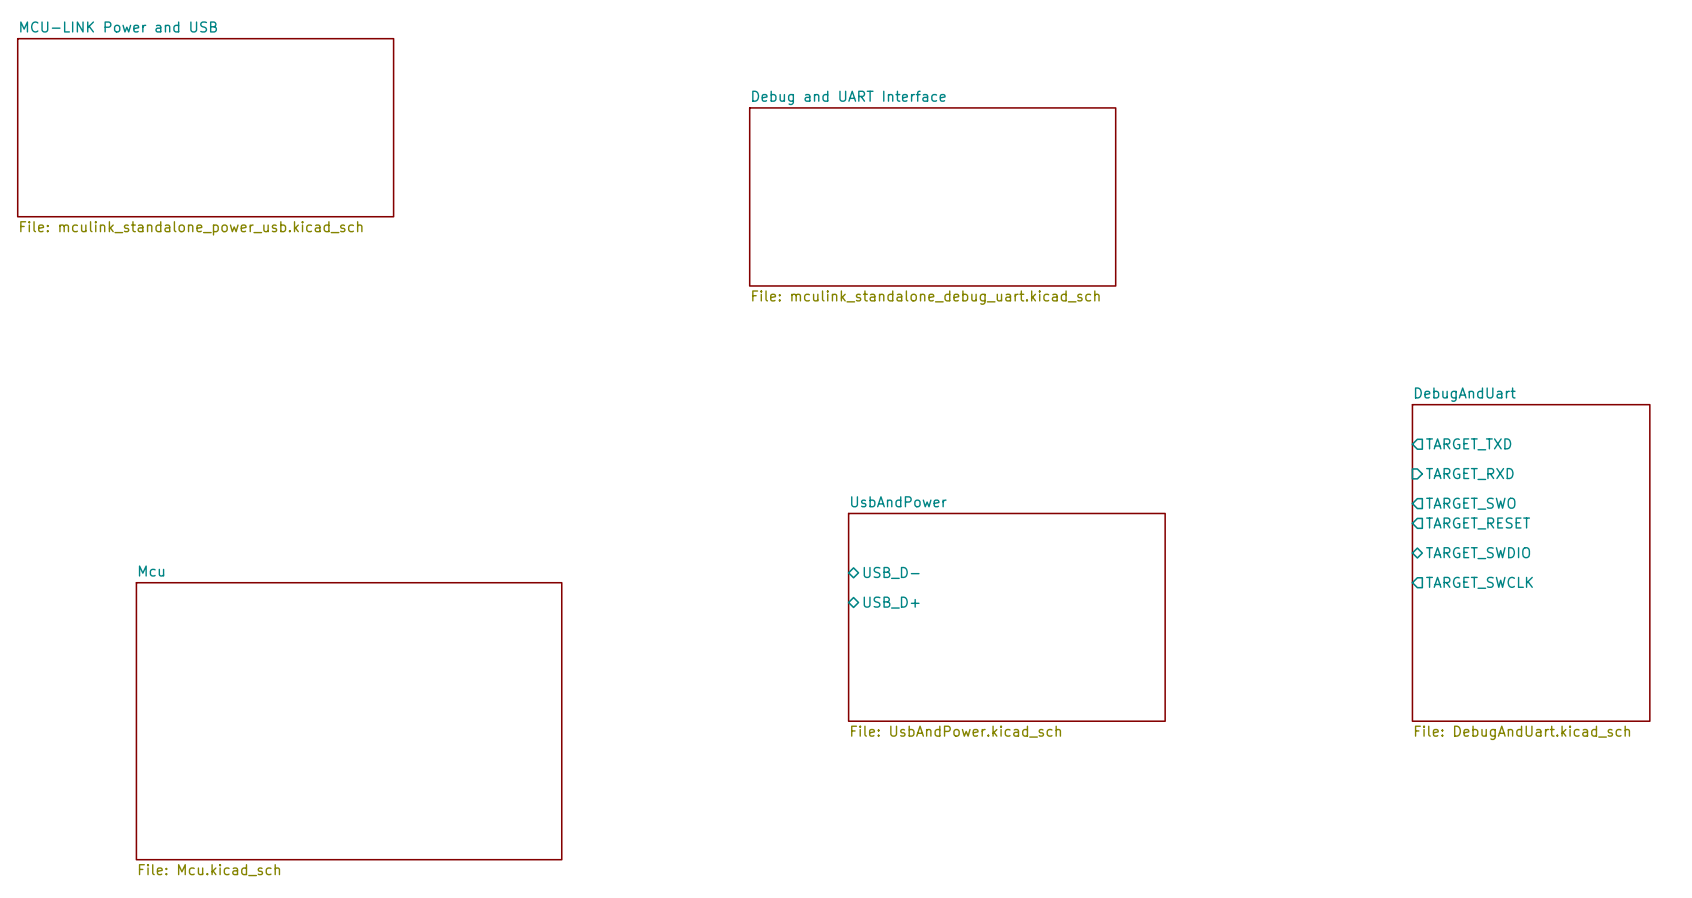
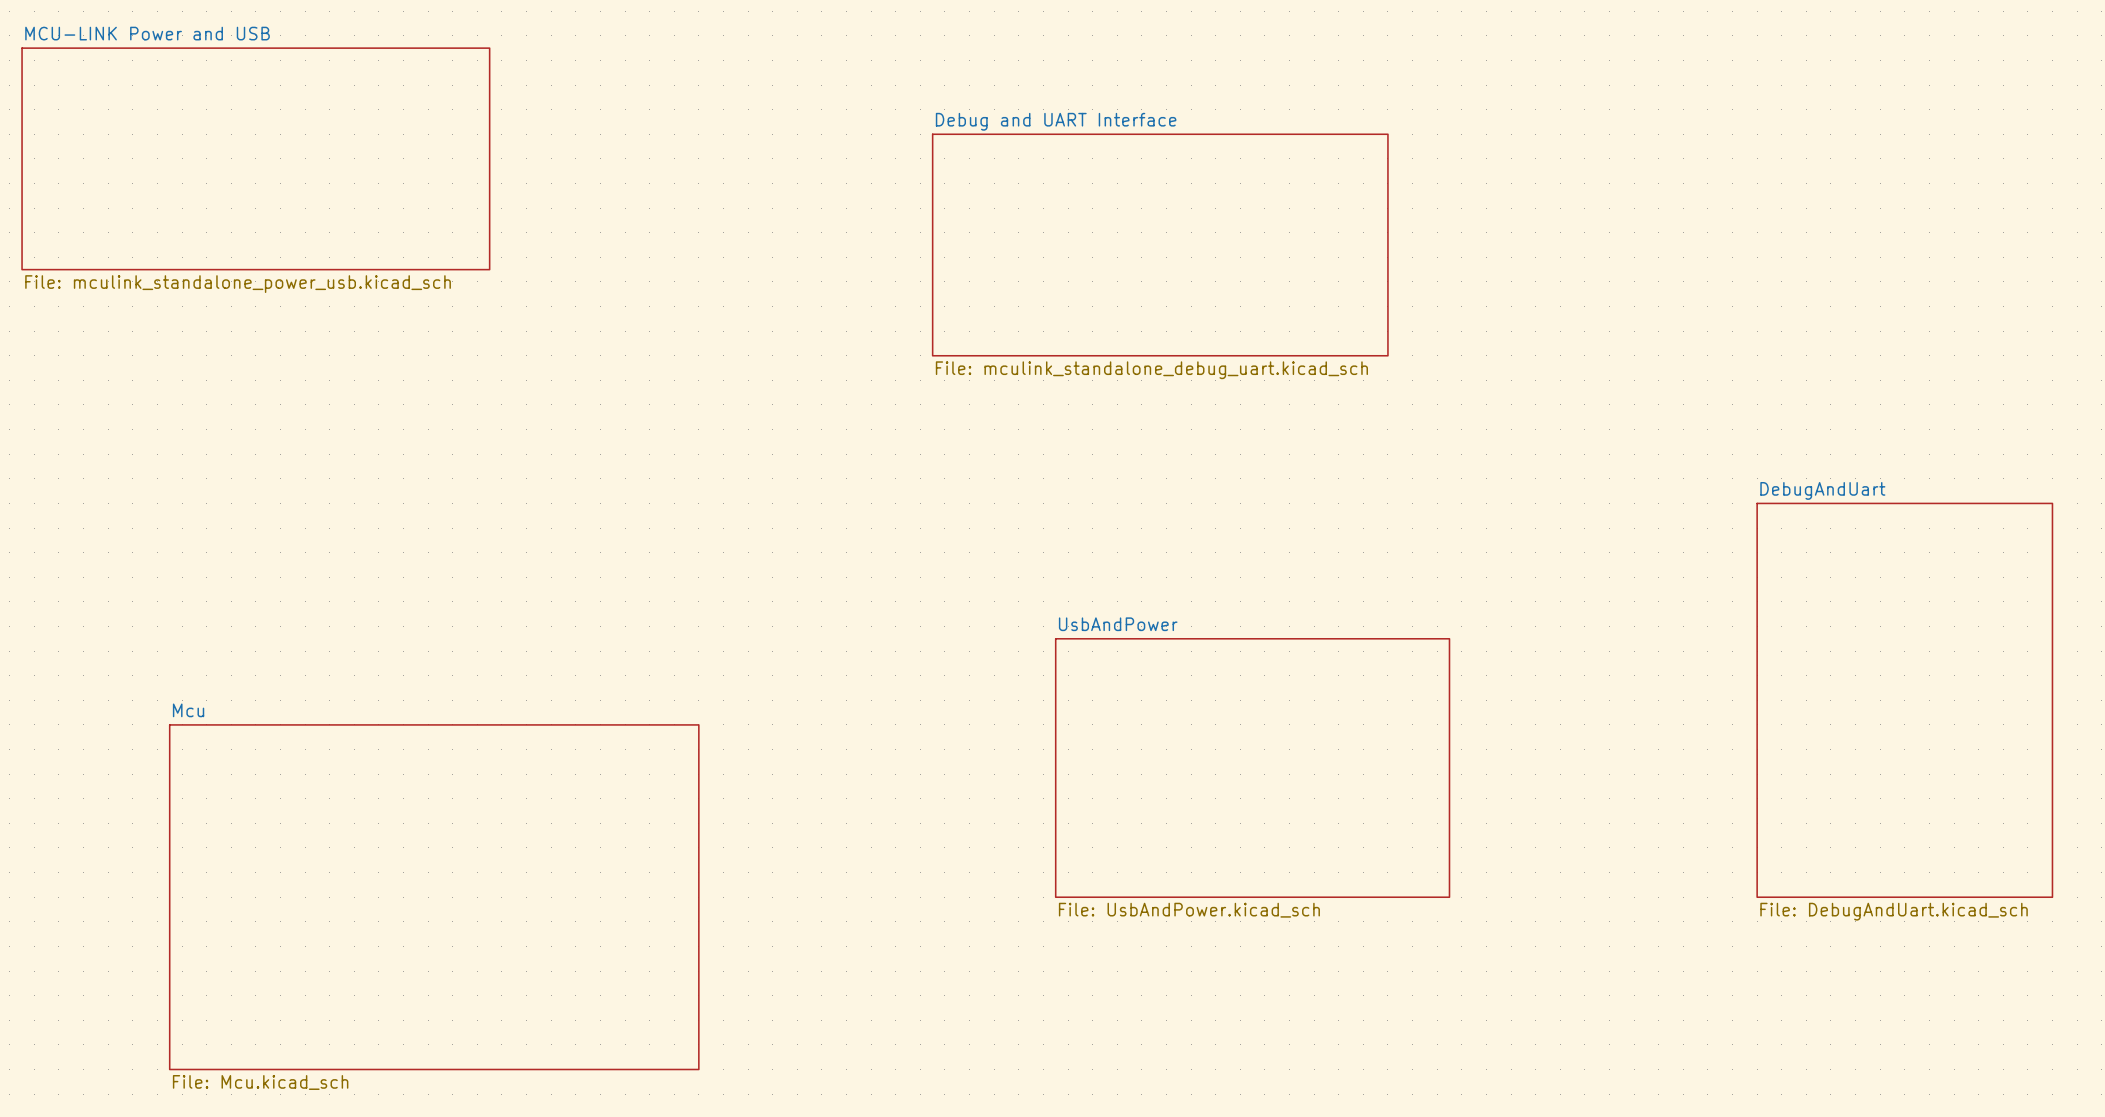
sheet pin: TARGET_TXD (1468, 444) -> none
sheet pin: TARGET_RXD (1469, 474) -> none
sheet pin: TARGET_SWO (1470, 503) -> none
sheet pin: TARGET_RESET (1478, 523) -> none
sheet pin: TARGET_SWDIO (1478, 553) -> none
sheet pin: USB_D- (891, 572) -> none
sheet pin: TARGET_SWCLK (1479, 582) -> none
sheet pin: USB_D+ (891, 602) -> none

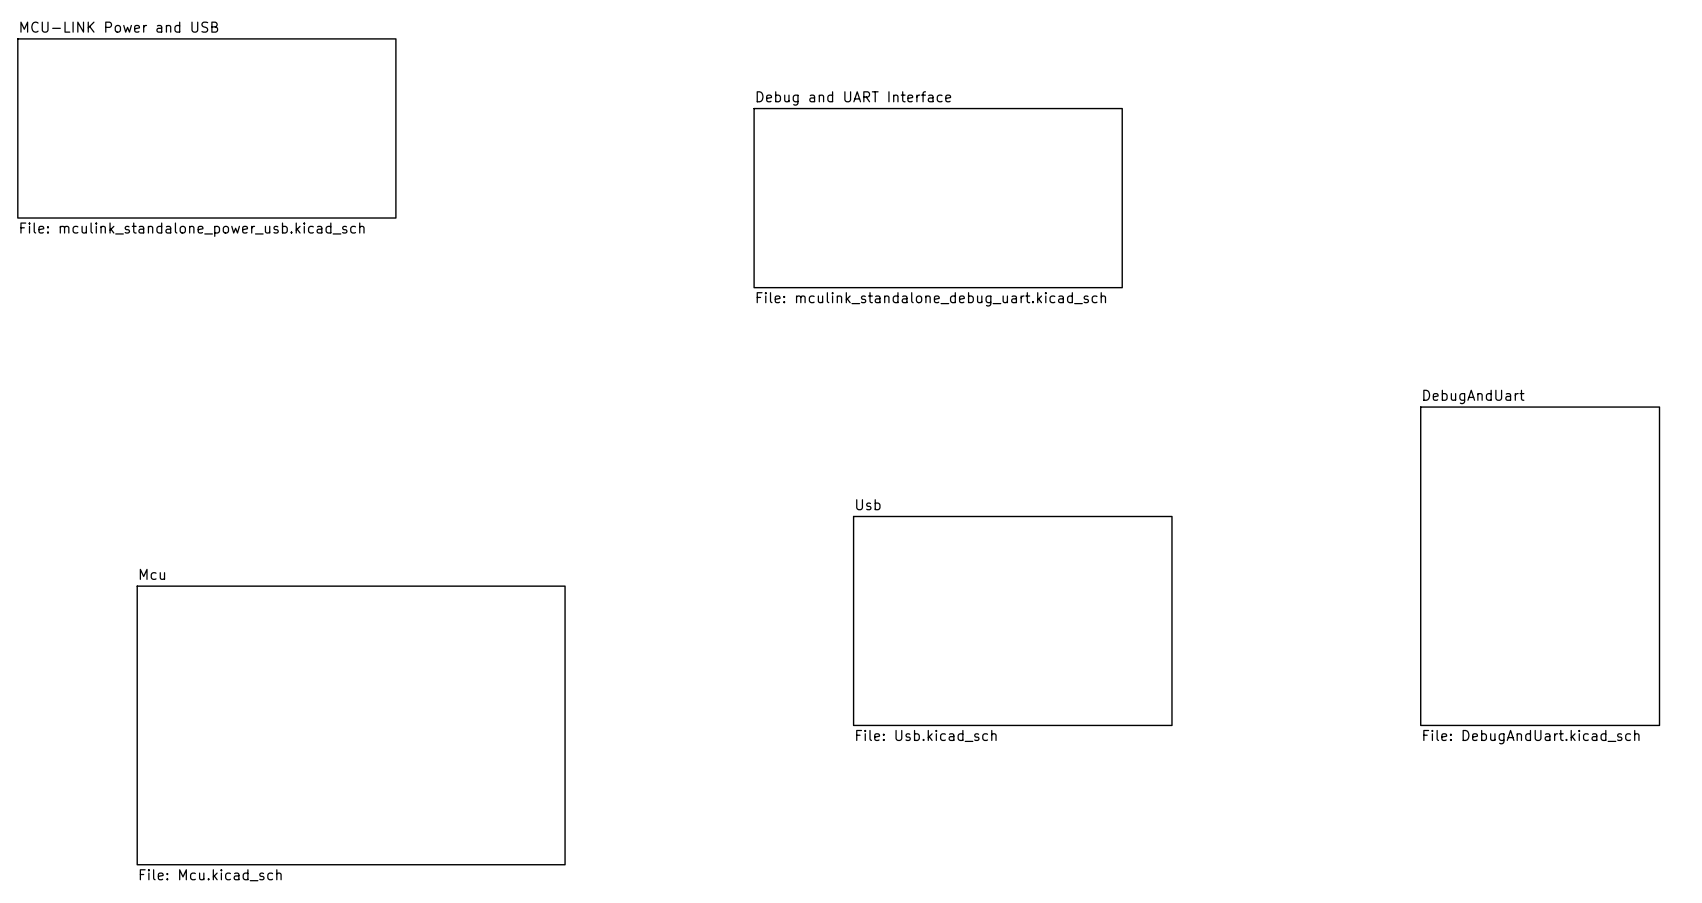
sheet UsbAndPower name: UsbAndPower (1118, 624) -> Usb (868, 504)
sheet UsbAndPower value: File: UsbAndPower.kicad_sch (1189, 910) -> File: Usb.kicad_sch (926, 735)

